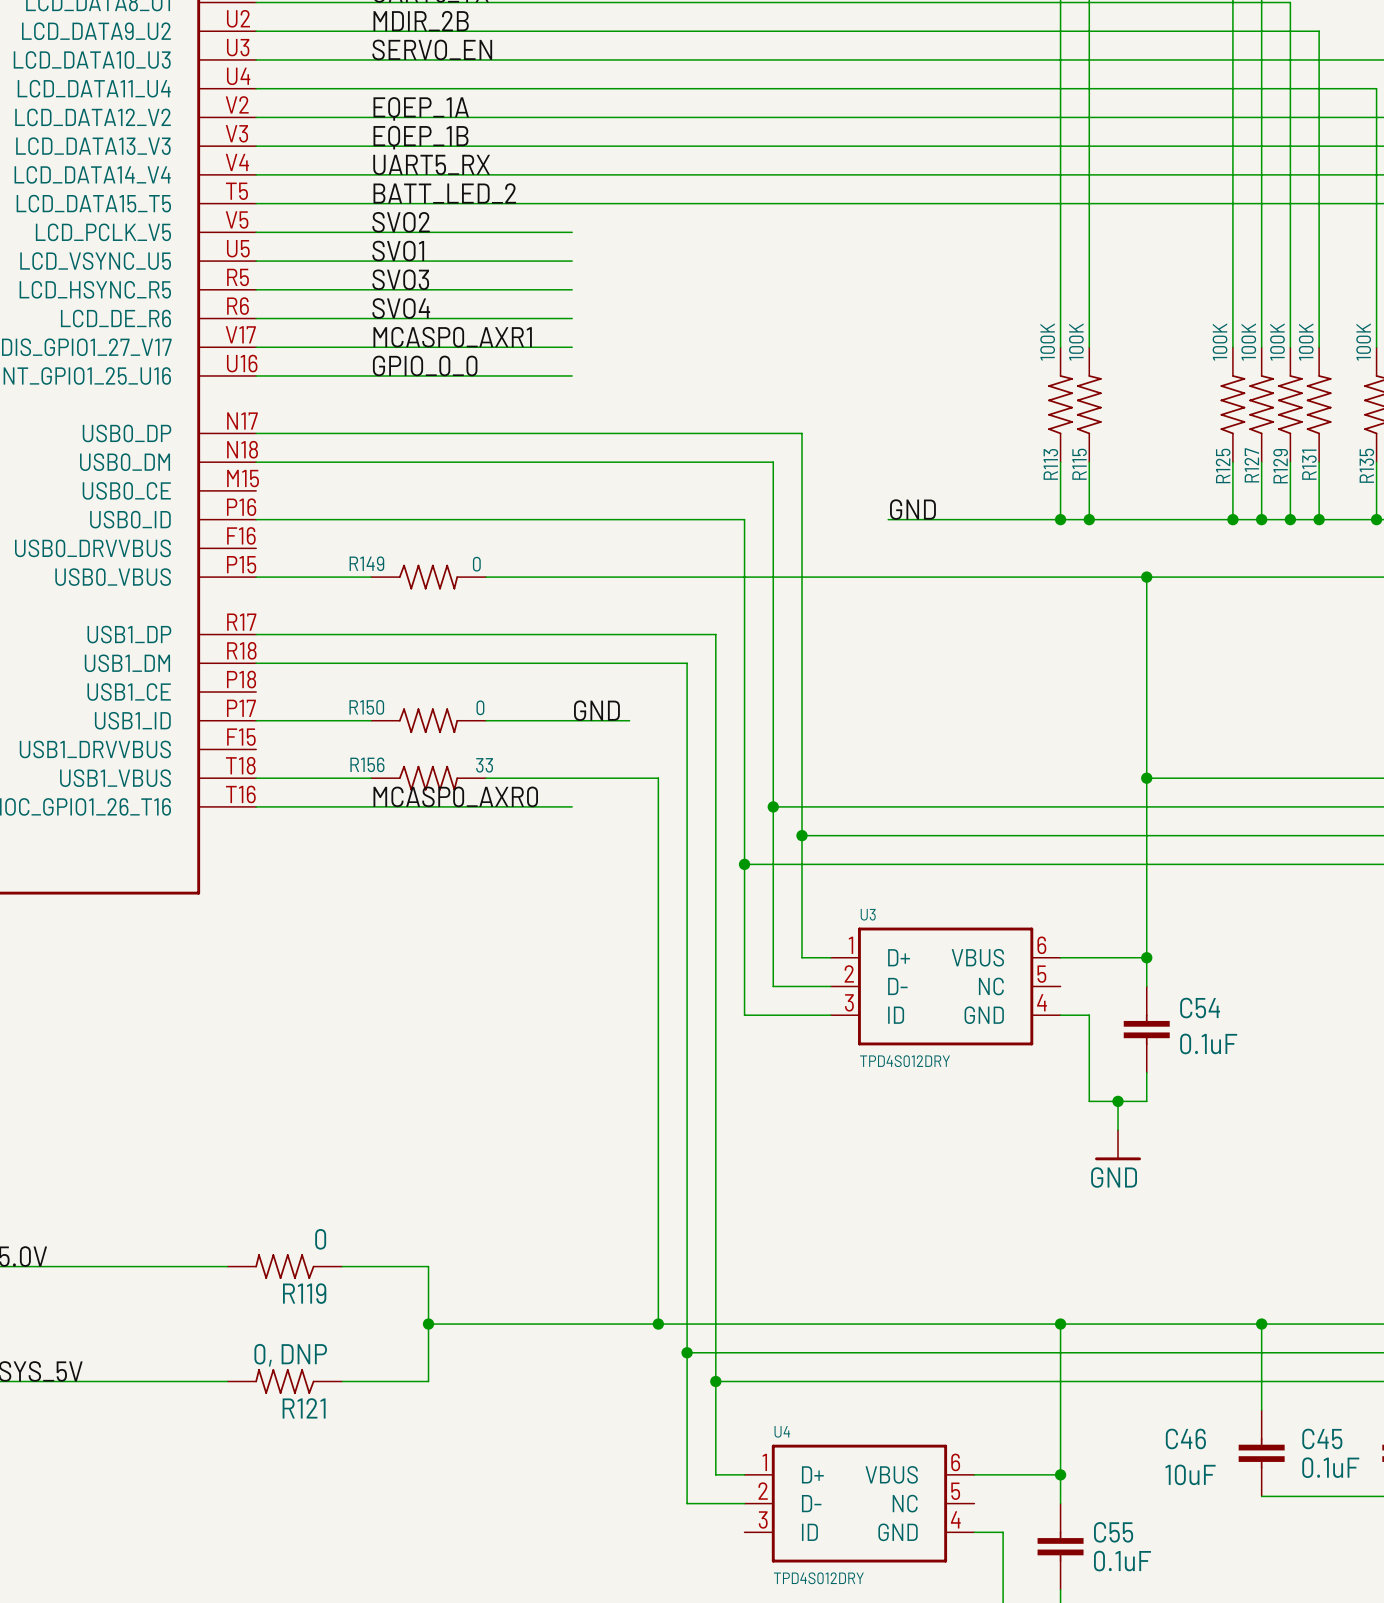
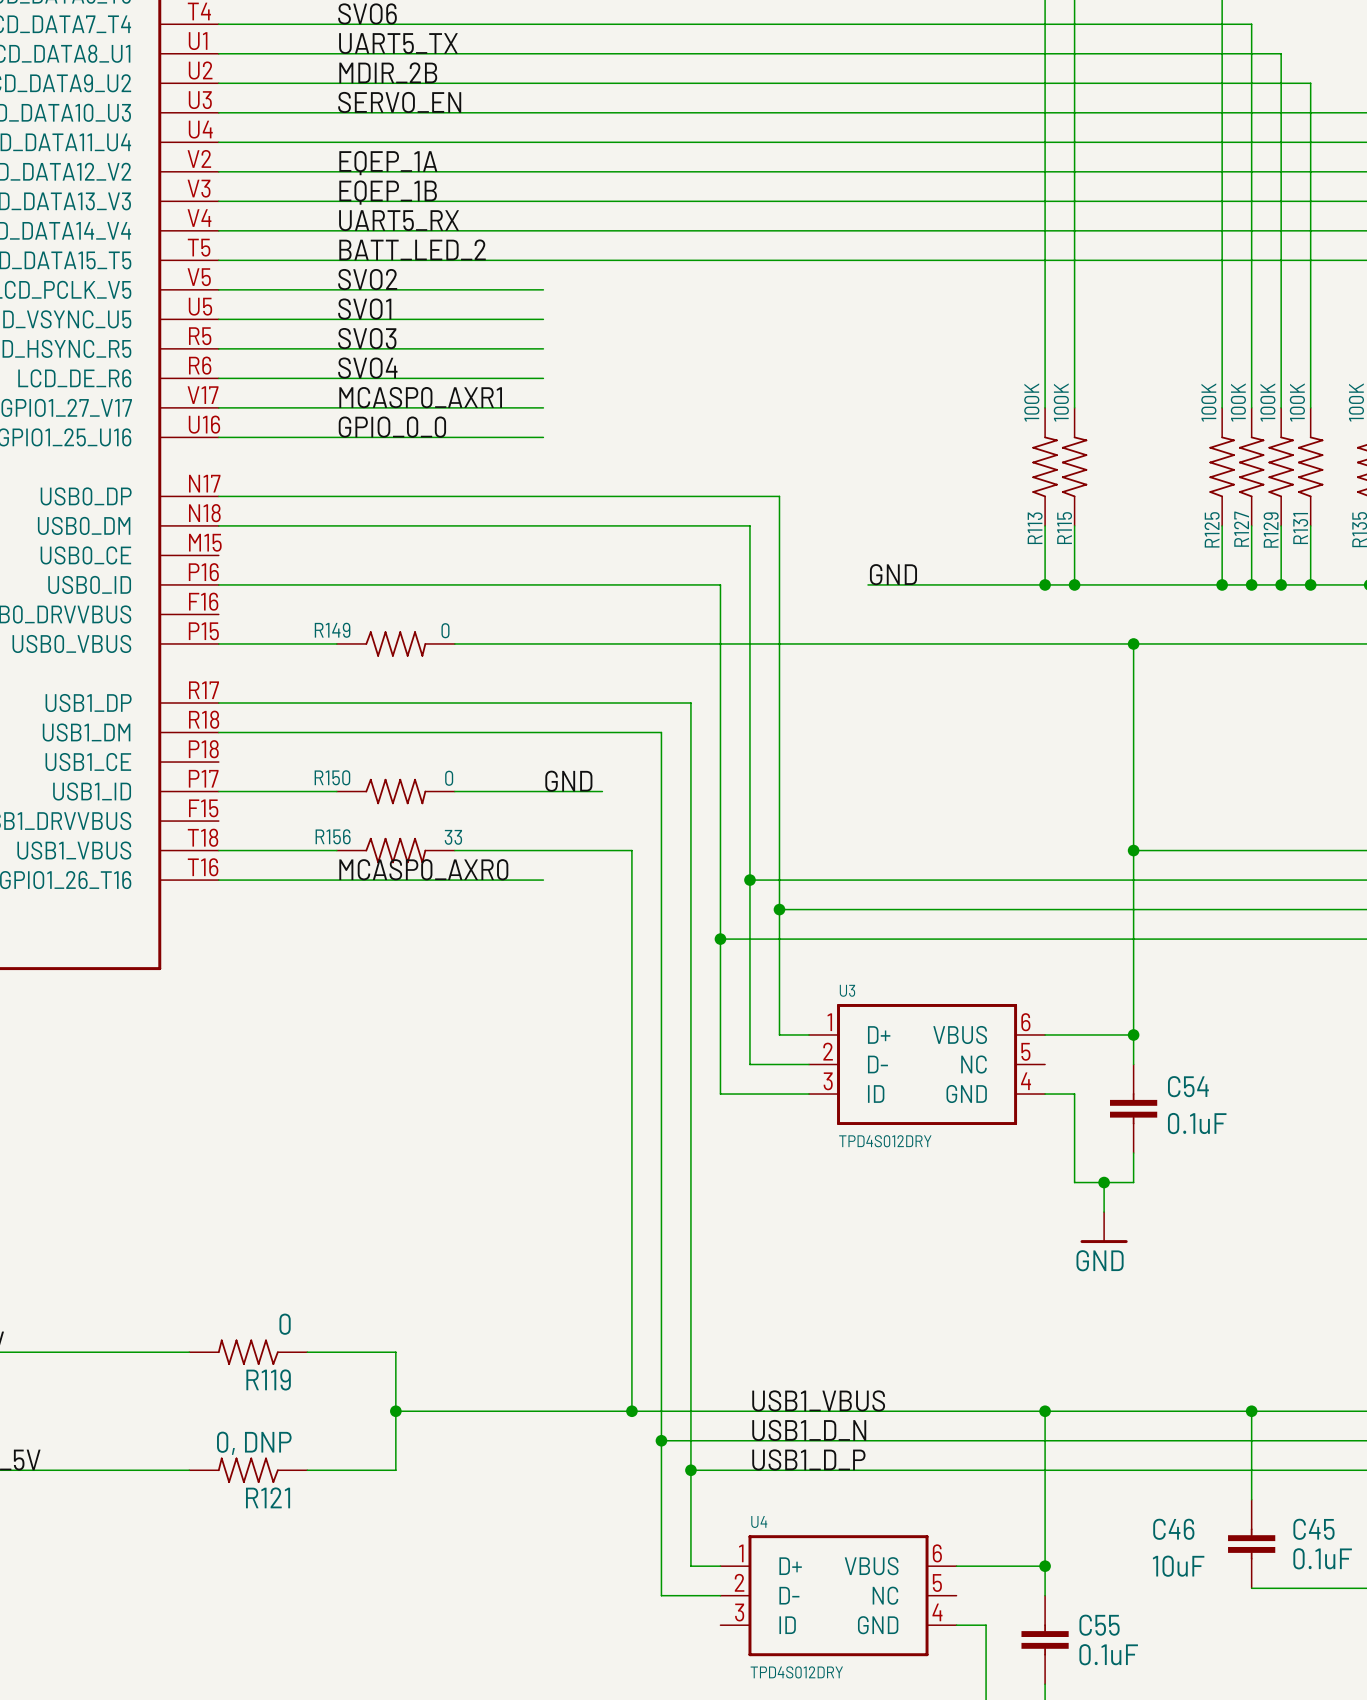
label: none -> USB1_VBUS (818, 1400)
label: none -> USB1_D_N (809, 1430)
label: none -> USB1_D_P (808, 1459)

